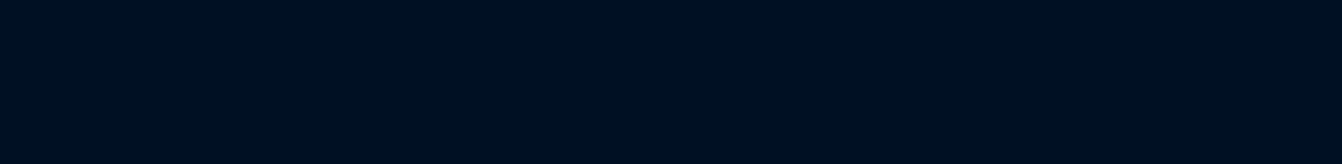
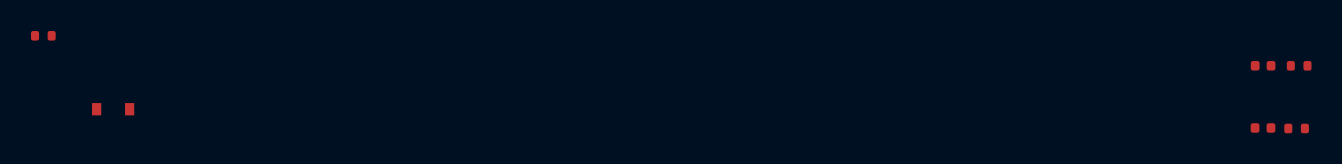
part: none -> (43, 35)
part: none -> (1263, 65)
part: none -> (1299, 65)
part: none -> (113, 109)
part: none -> (1262, 127)
part: none -> (1296, 128)

